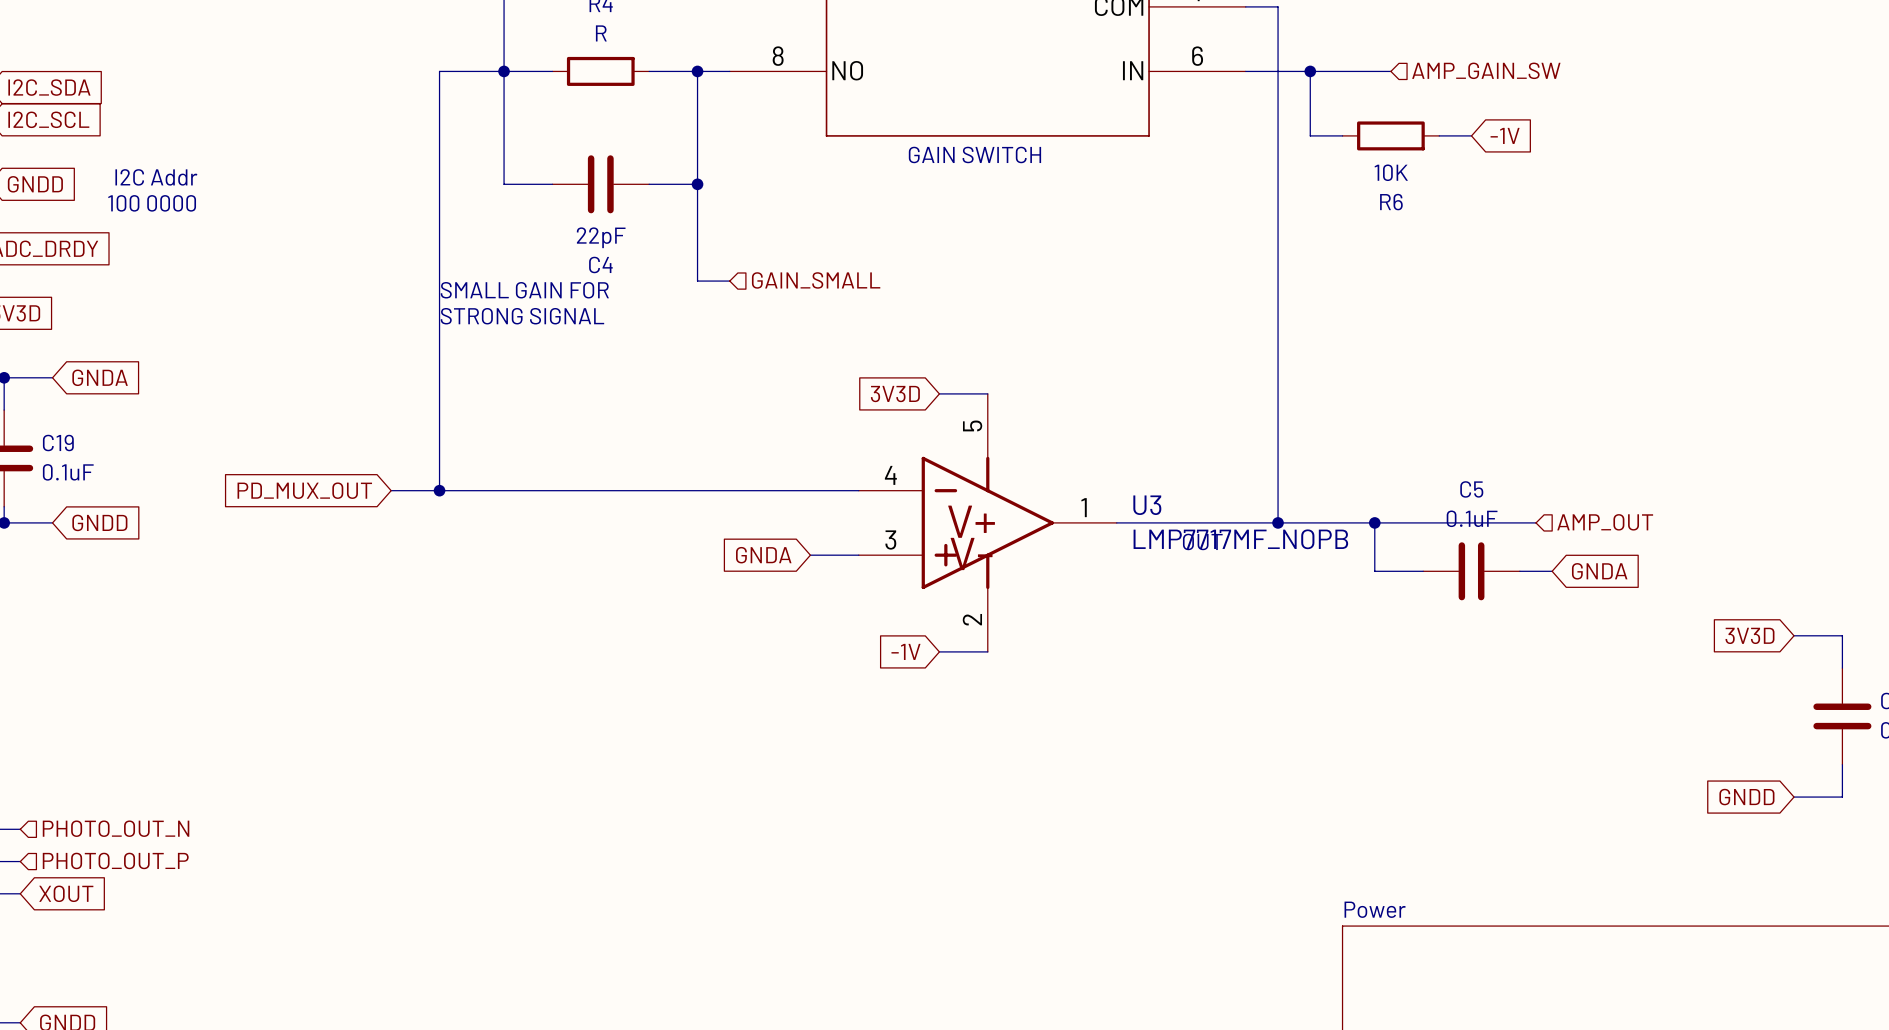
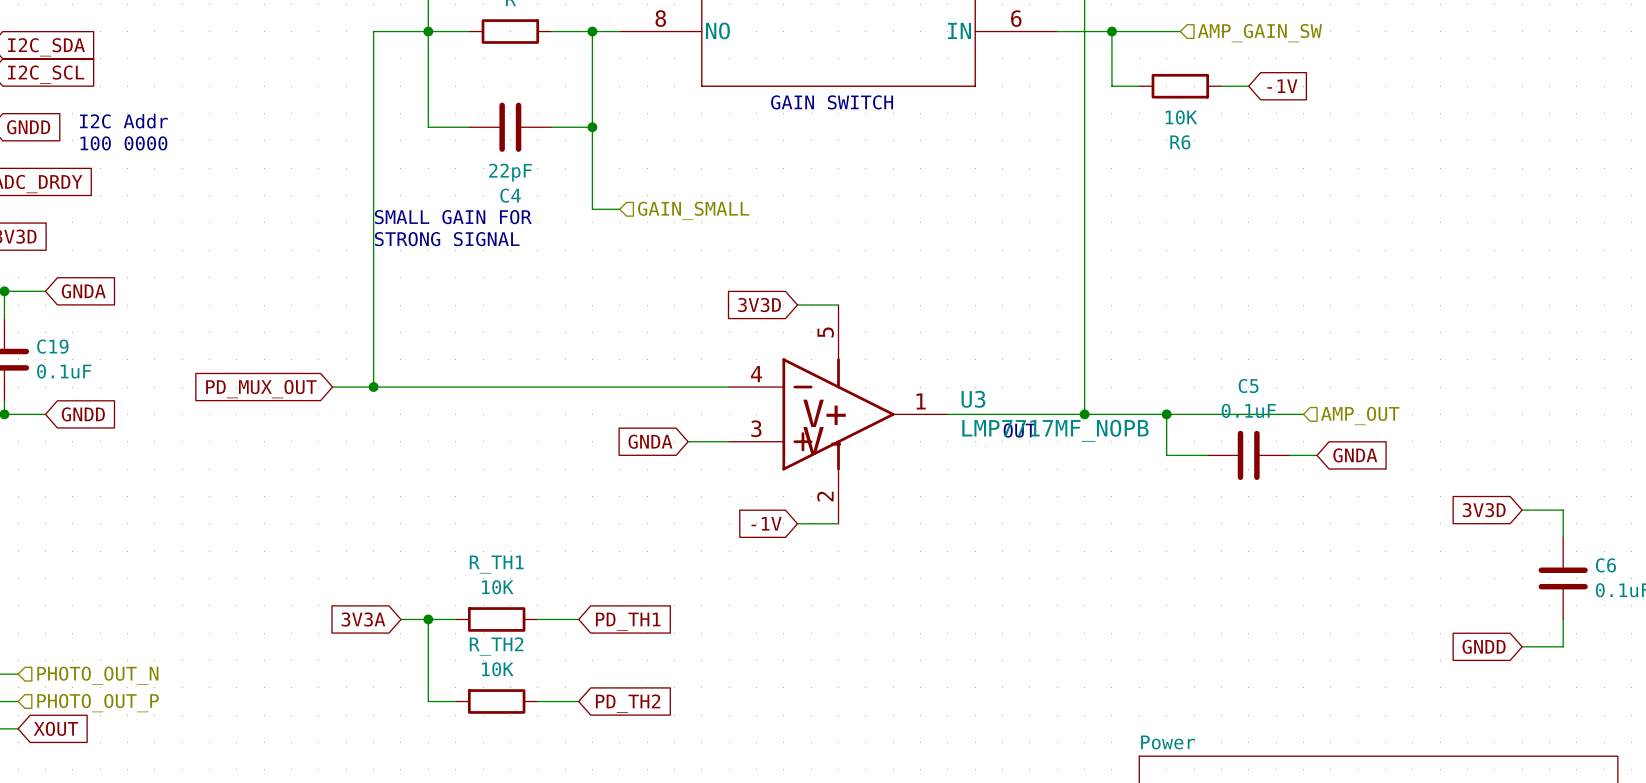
global label: none -> 3V3A (363, 619)
wire: none -> (400, 619) (455, 619)
wire: none -> (428, 619) (428, 701) (455, 701)
junction: none -> (428, 619)
R_TH1: none -> 10K (496, 619)
wire: none -> (537, 619) (578, 619)
global label: none -> PD_TH1 (628, 621)
R_TH2: none -> 10K (496, 701)
wire: none -> (537, 701) (578, 701)
global label: none -> PD_TH2 (628, 703)

